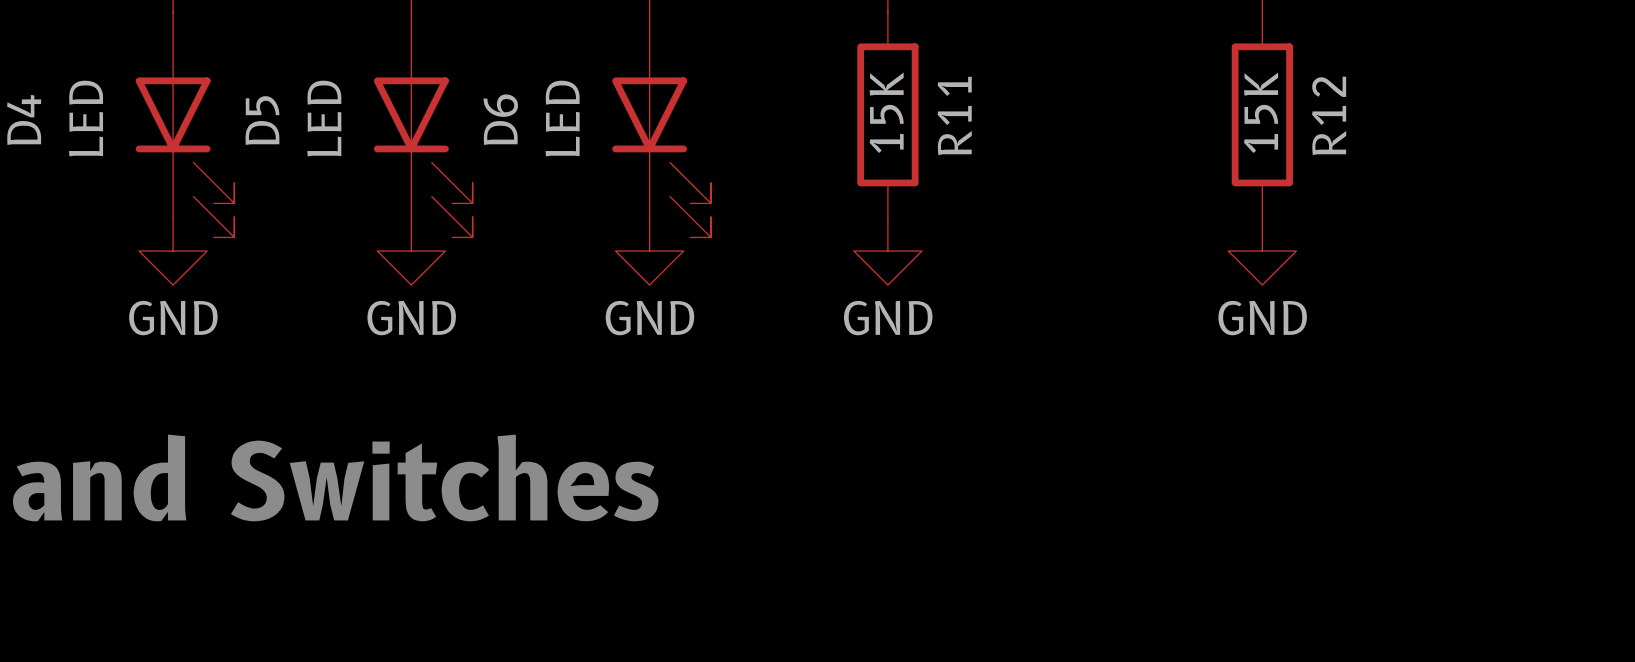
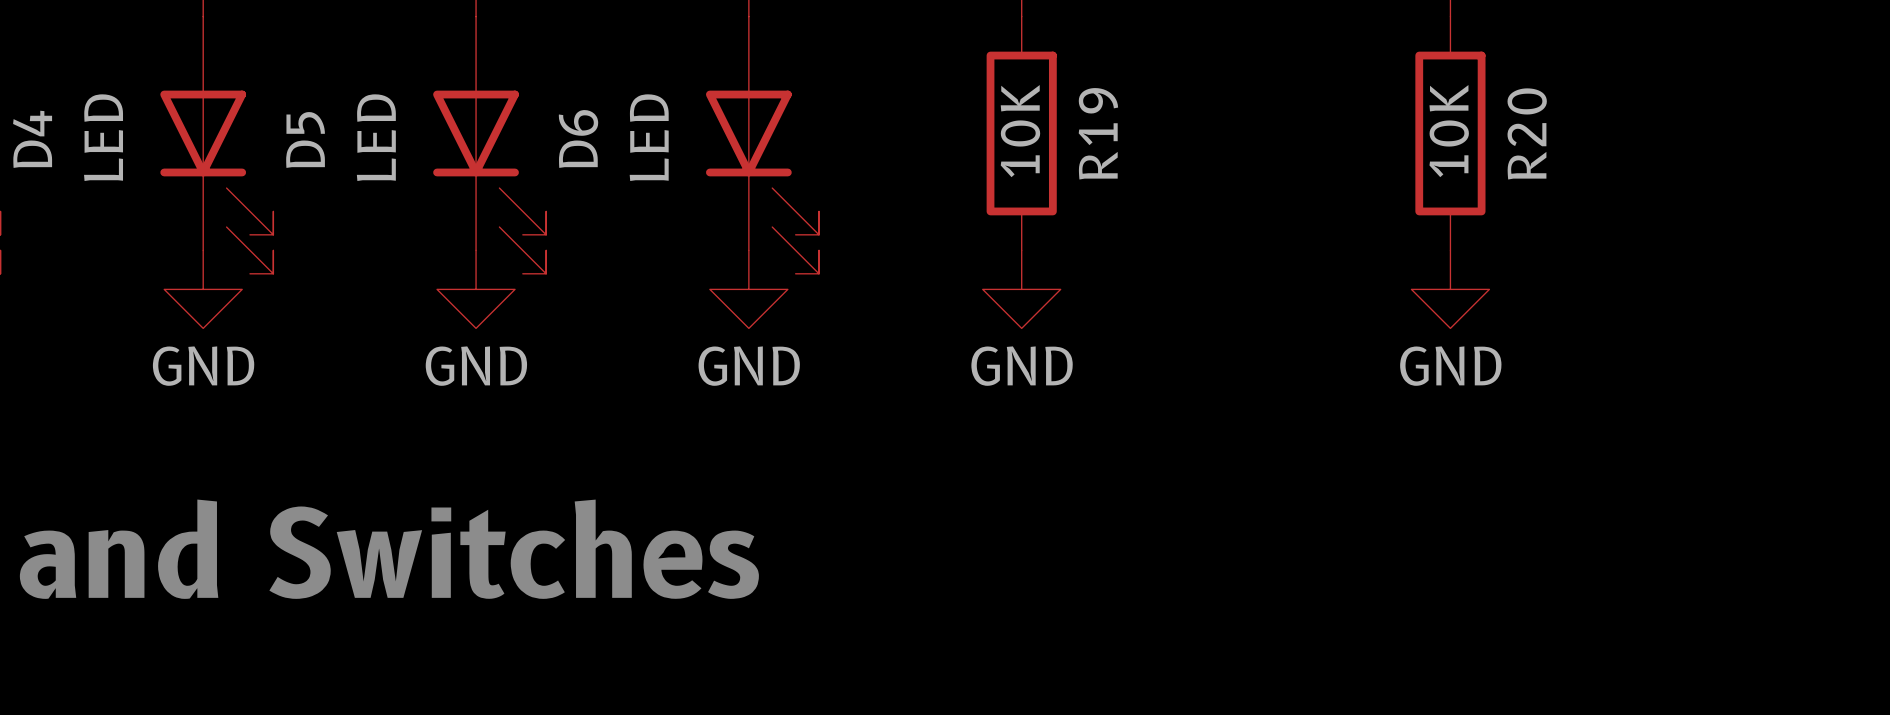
R11 value: 15K (886, 112) -> 10K (1020, 131)
R12 value: 15K (1261, 112) -> 10K (1449, 131)
R11 name: R11 (954, 115) -> R19 (1098, 133)
R12 name: R12 (1329, 115) -> R20 (1527, 133)

